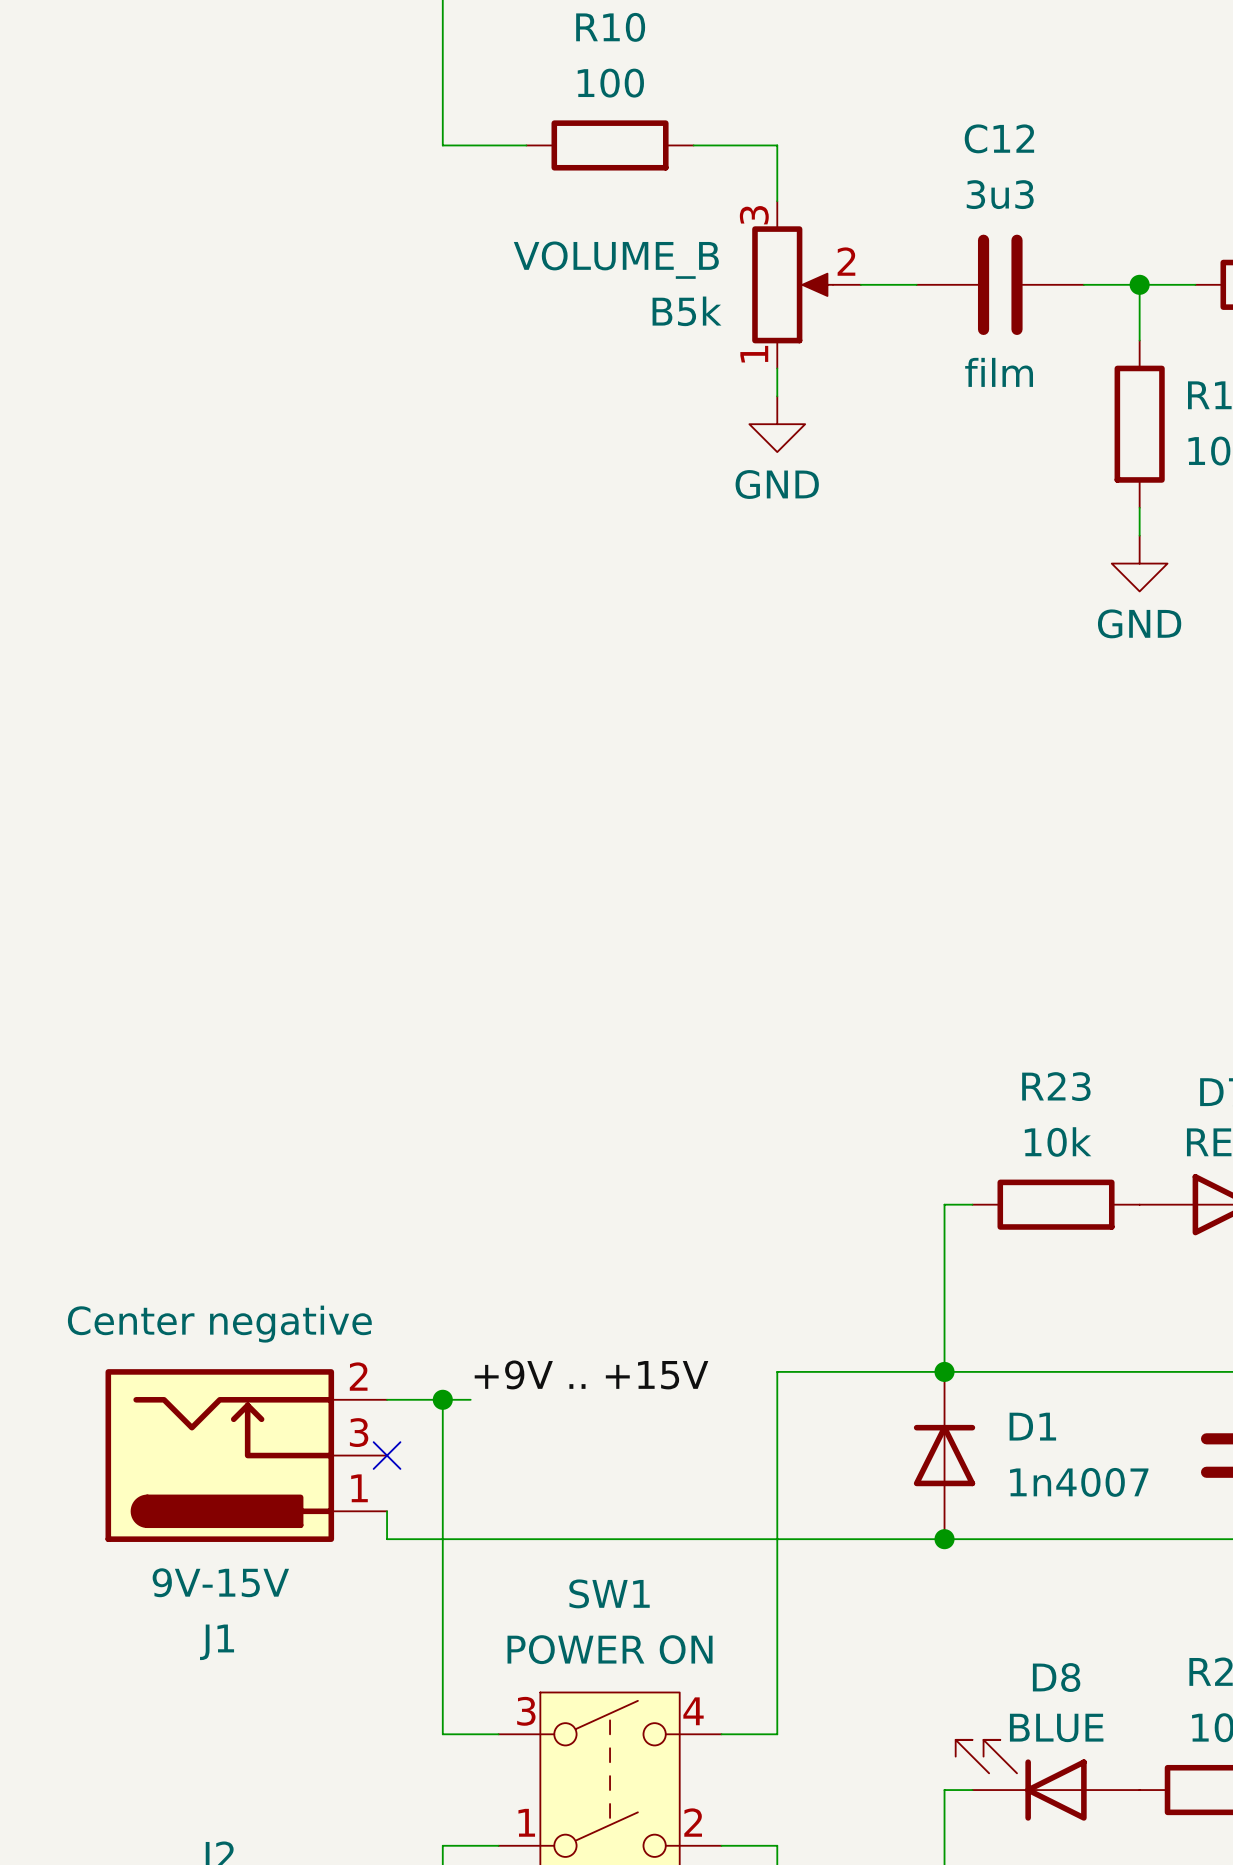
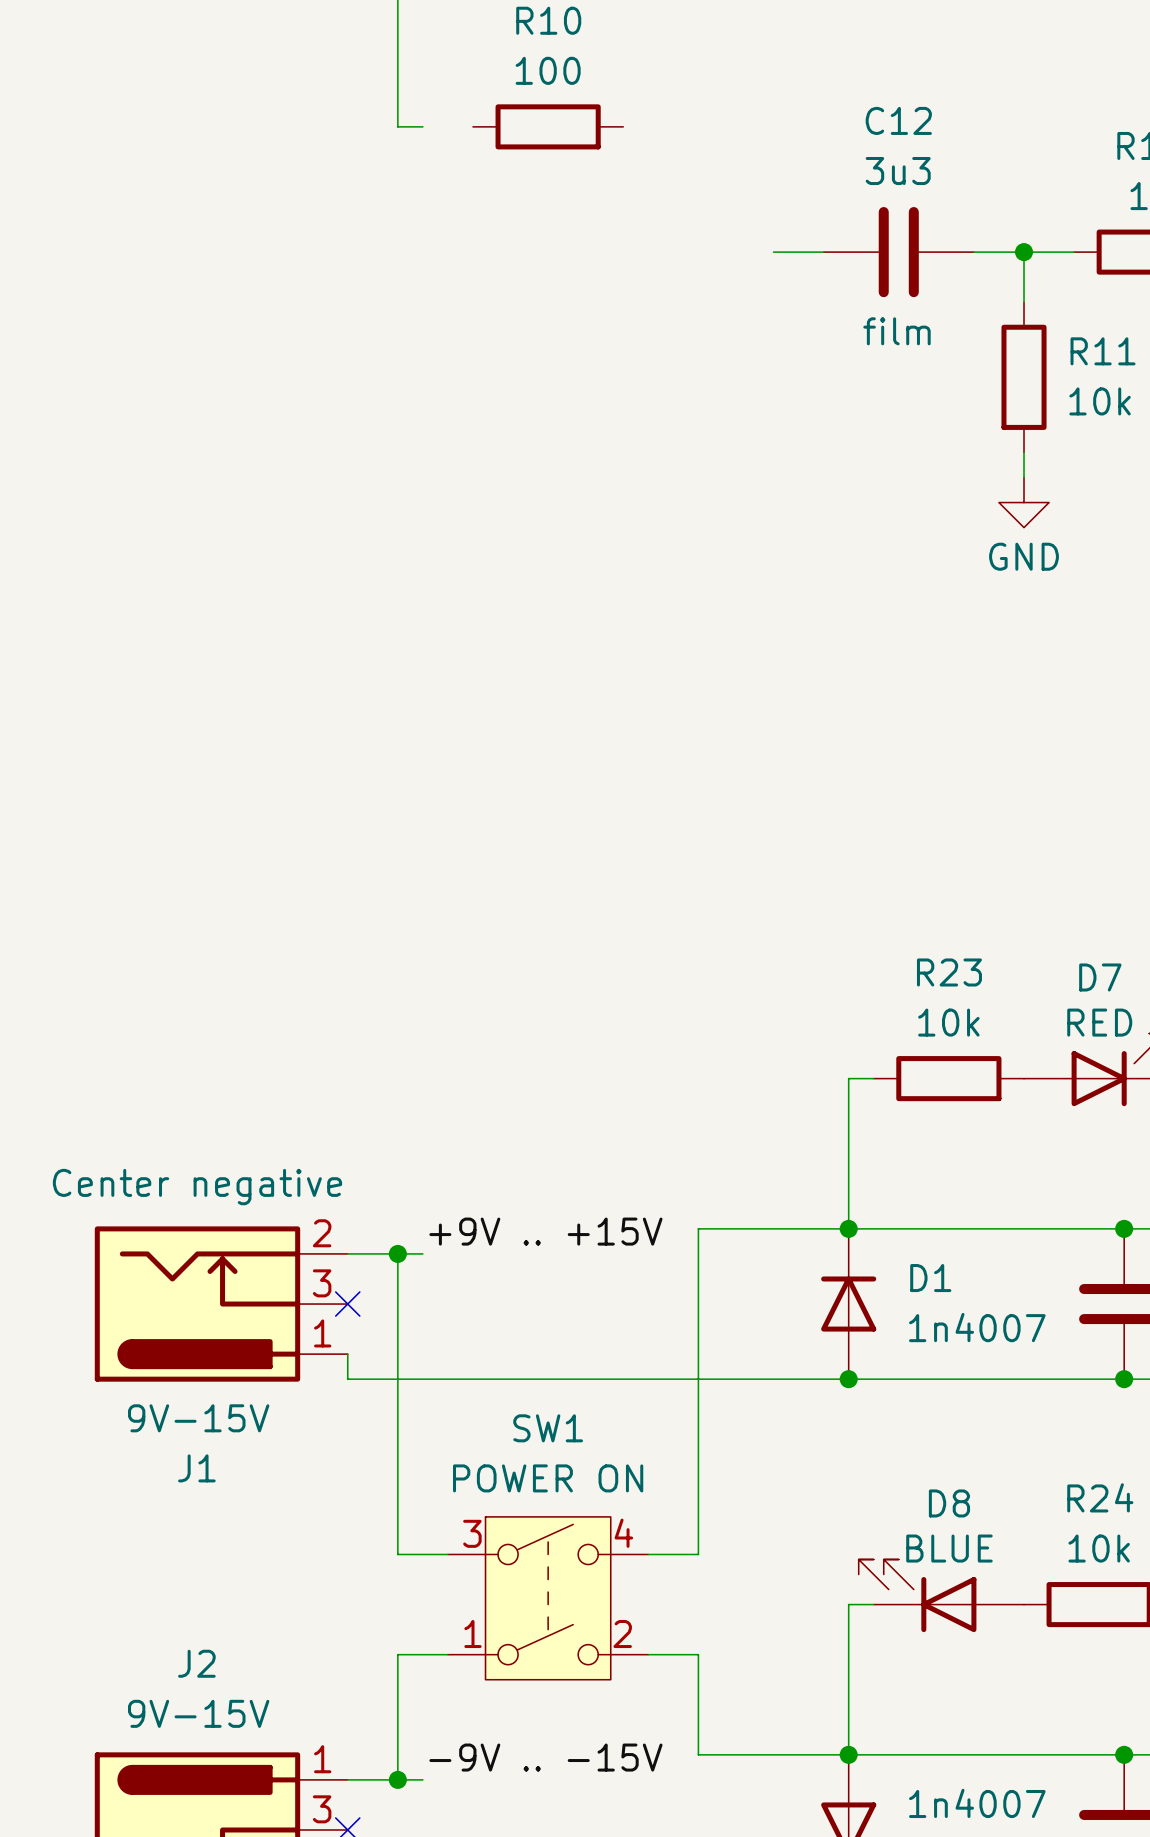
wire: (470, 145) (526, 145) -> none
wire: (693, 145) (777, 145) (777, 201) -> none
VOLUME_B: B5k (806, 284) -> none
wire: (777, 368) (777, 396) -> none
power symbol: GND (777, 424) -> none

